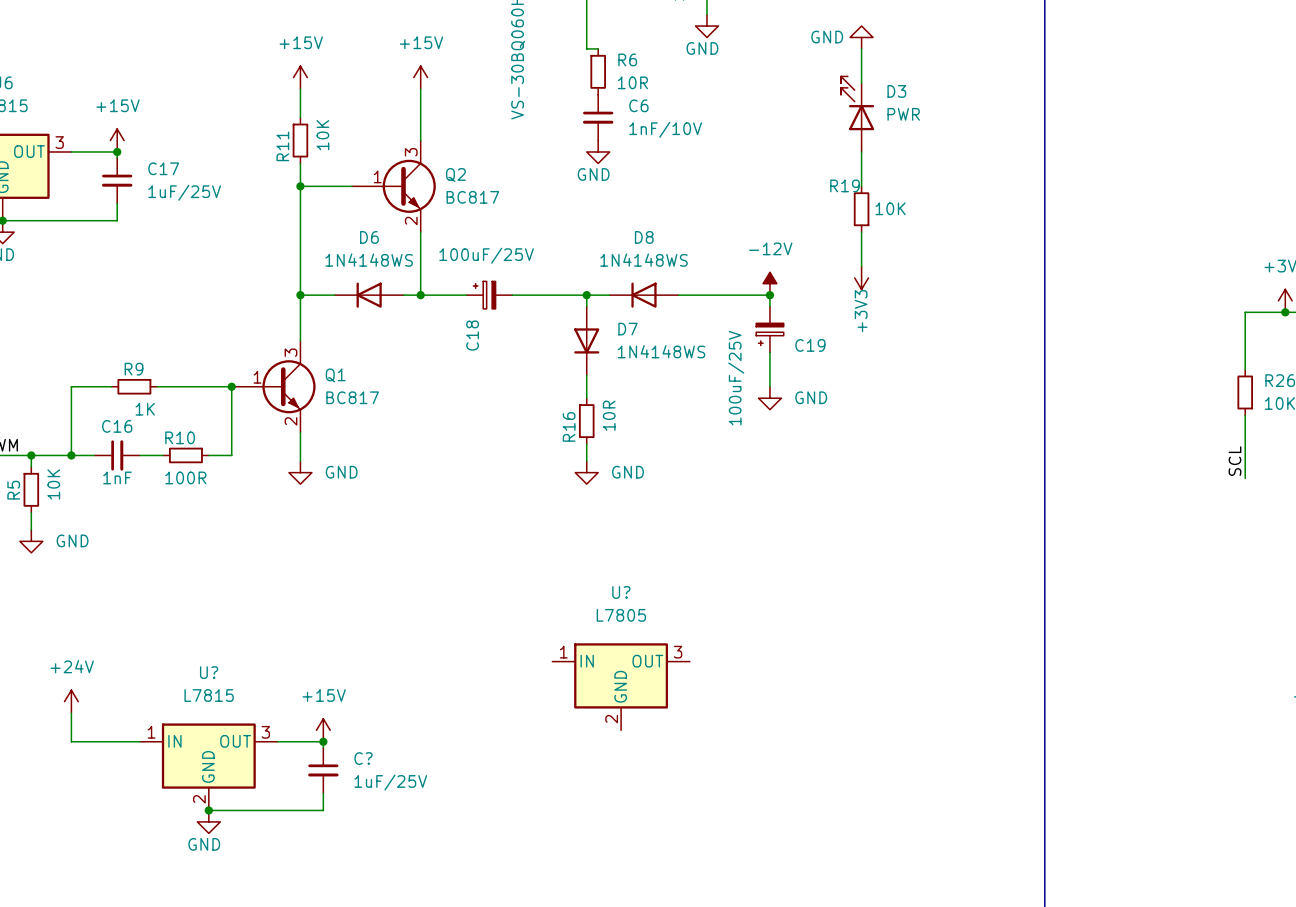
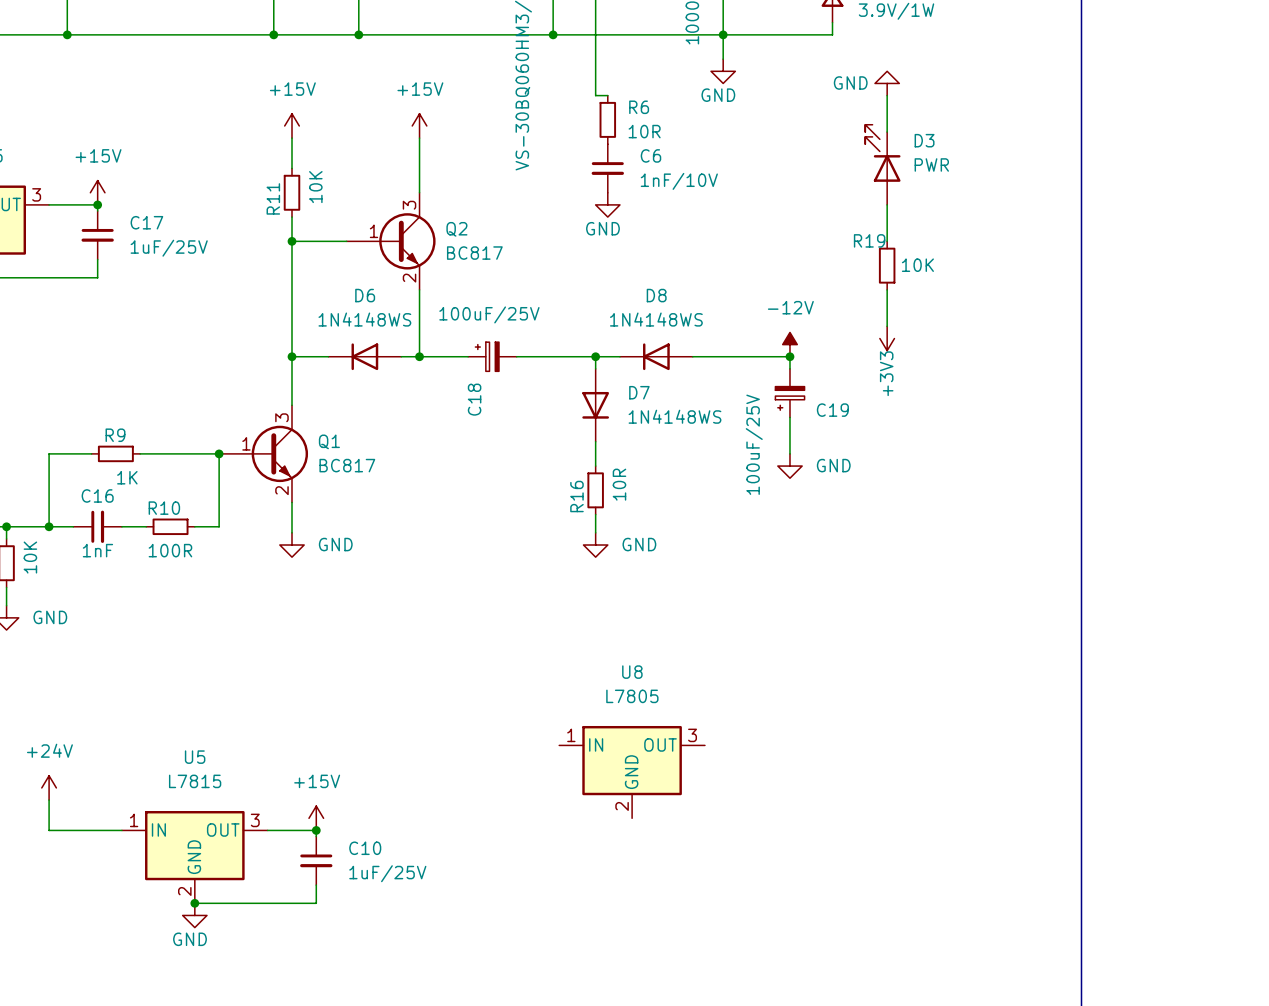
U? name: U? (621, 592) -> U8 (632, 672)
U? name: U? (209, 672) -> U5 (195, 757)
C? name: C? (363, 758) -> C10 (365, 848)

